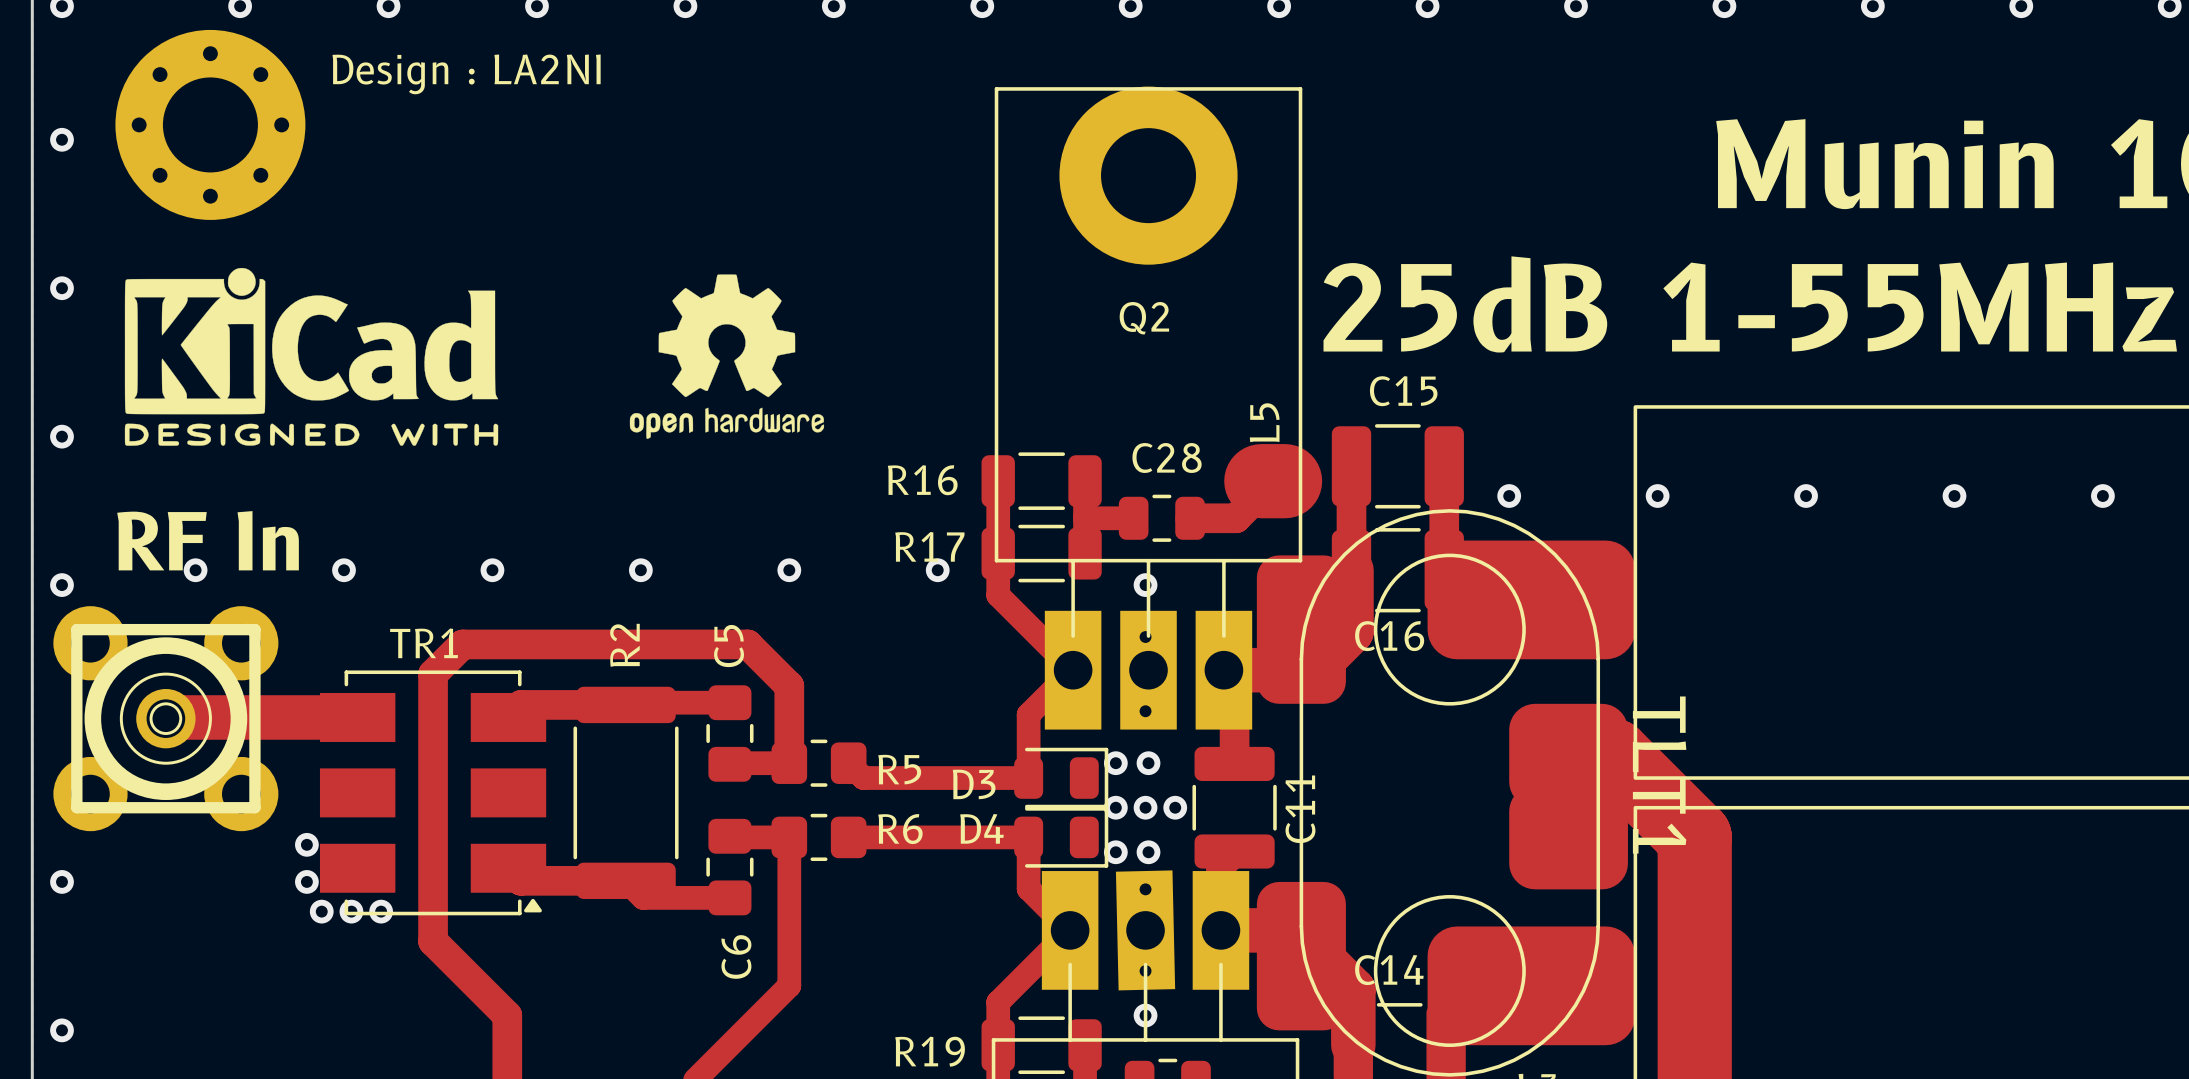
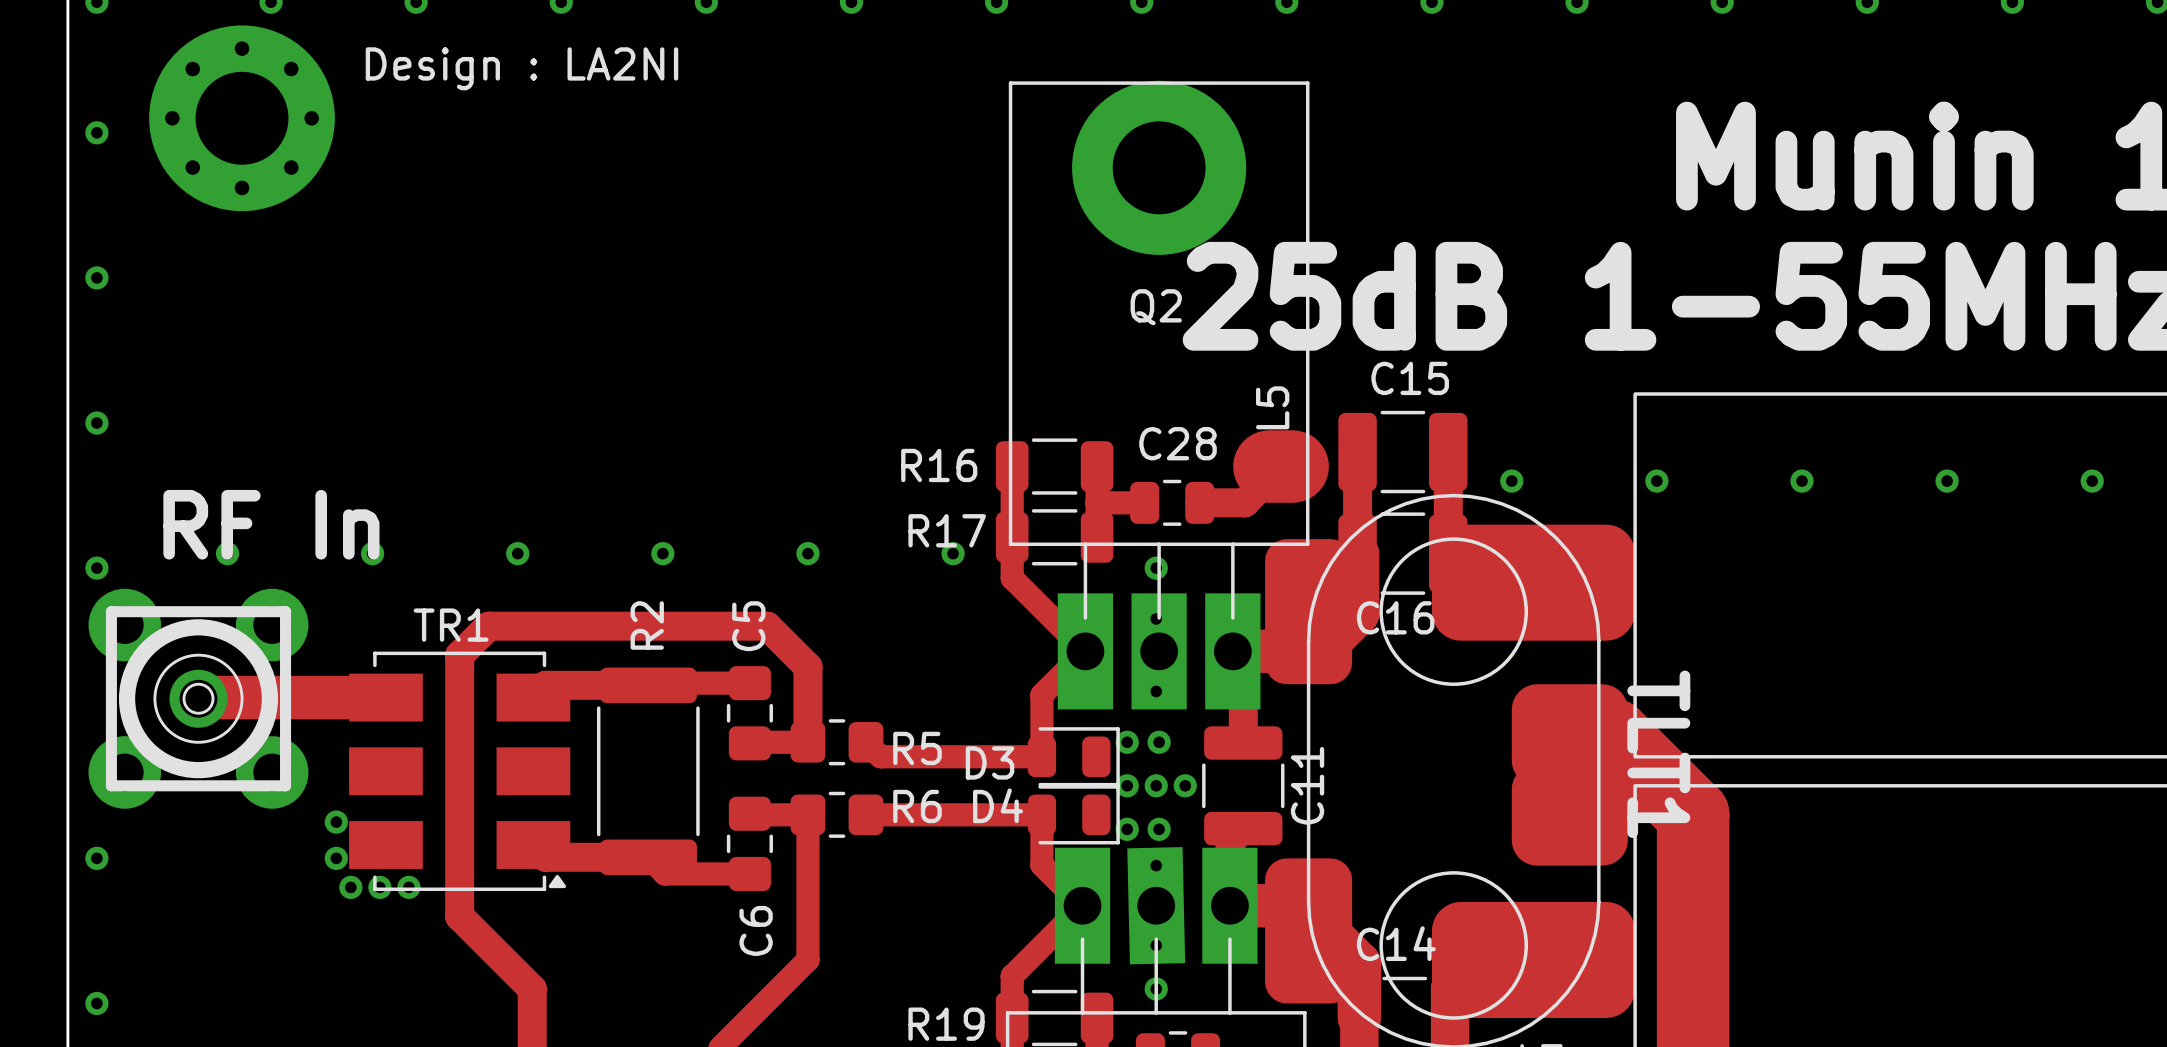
drawing: [124, 267, 499, 446] -> none
drawing: [629, 274, 825, 439] -> none

